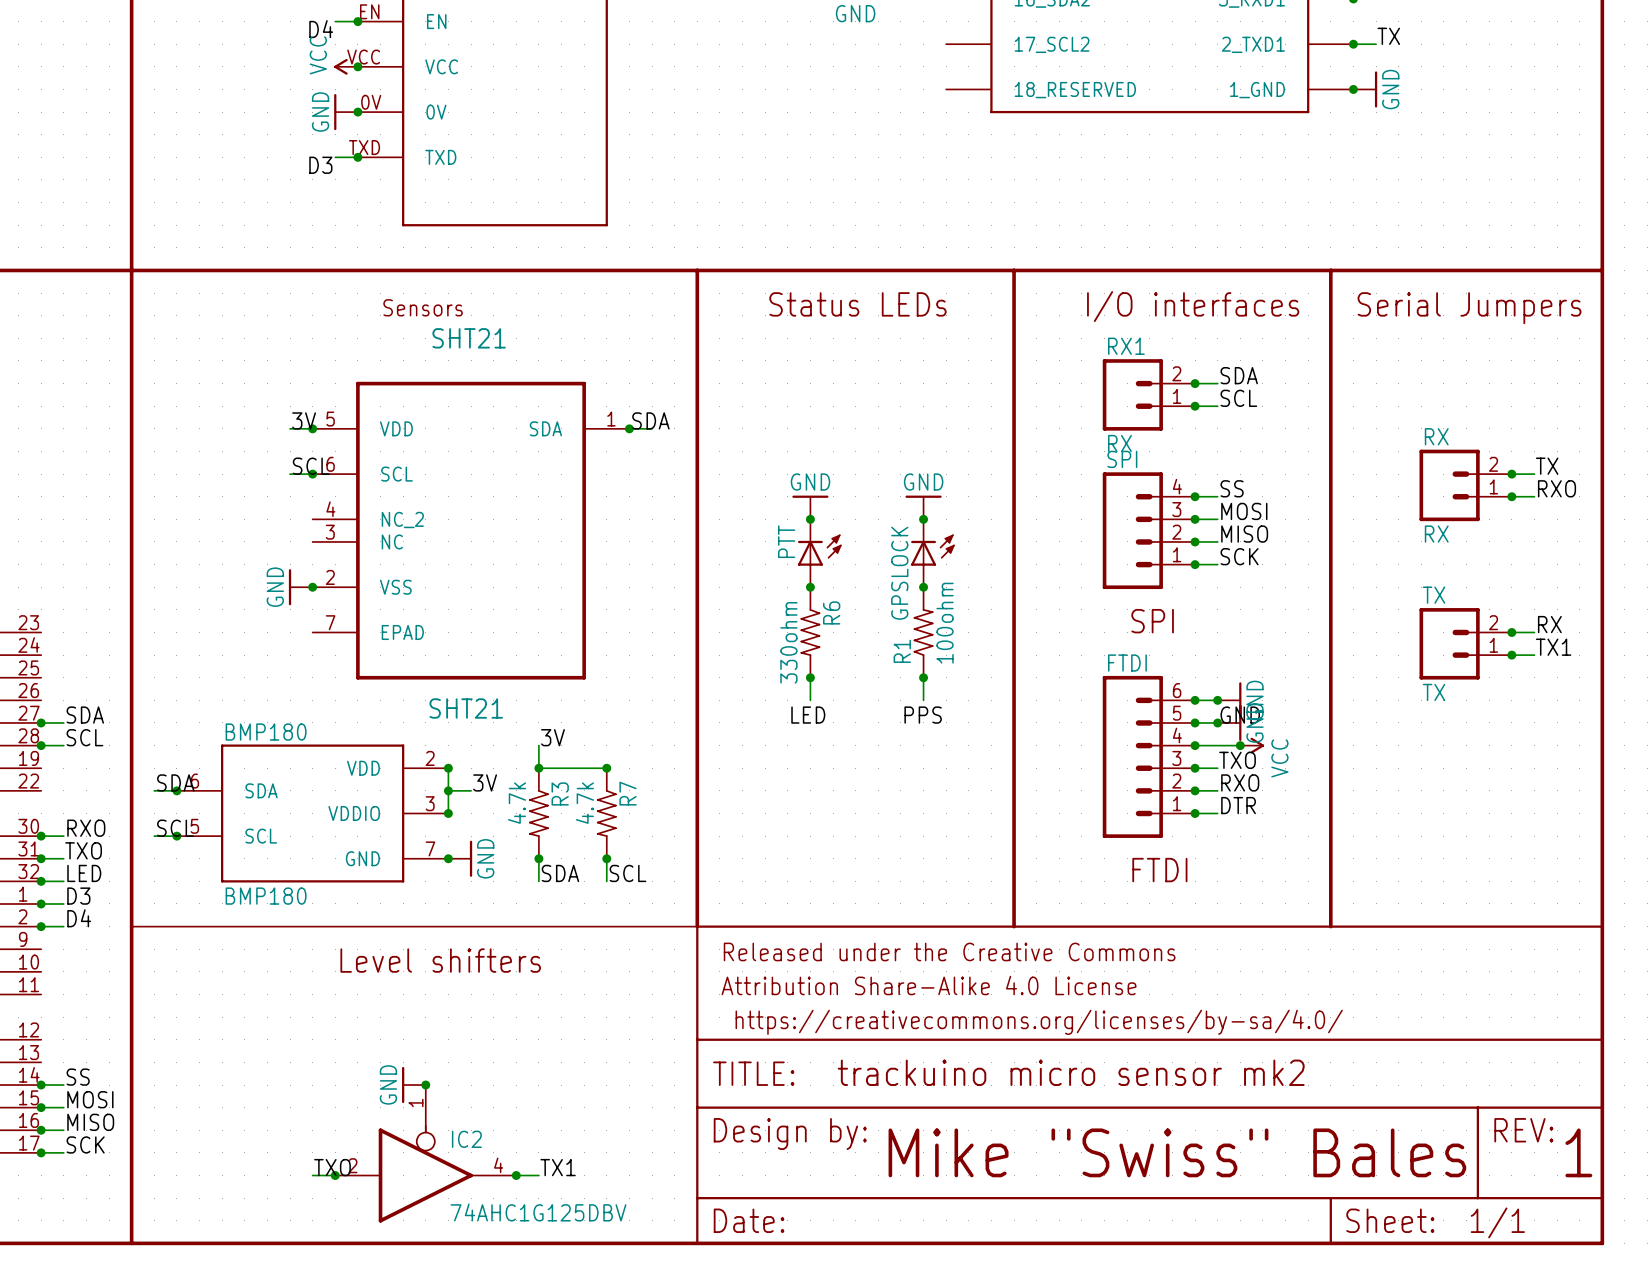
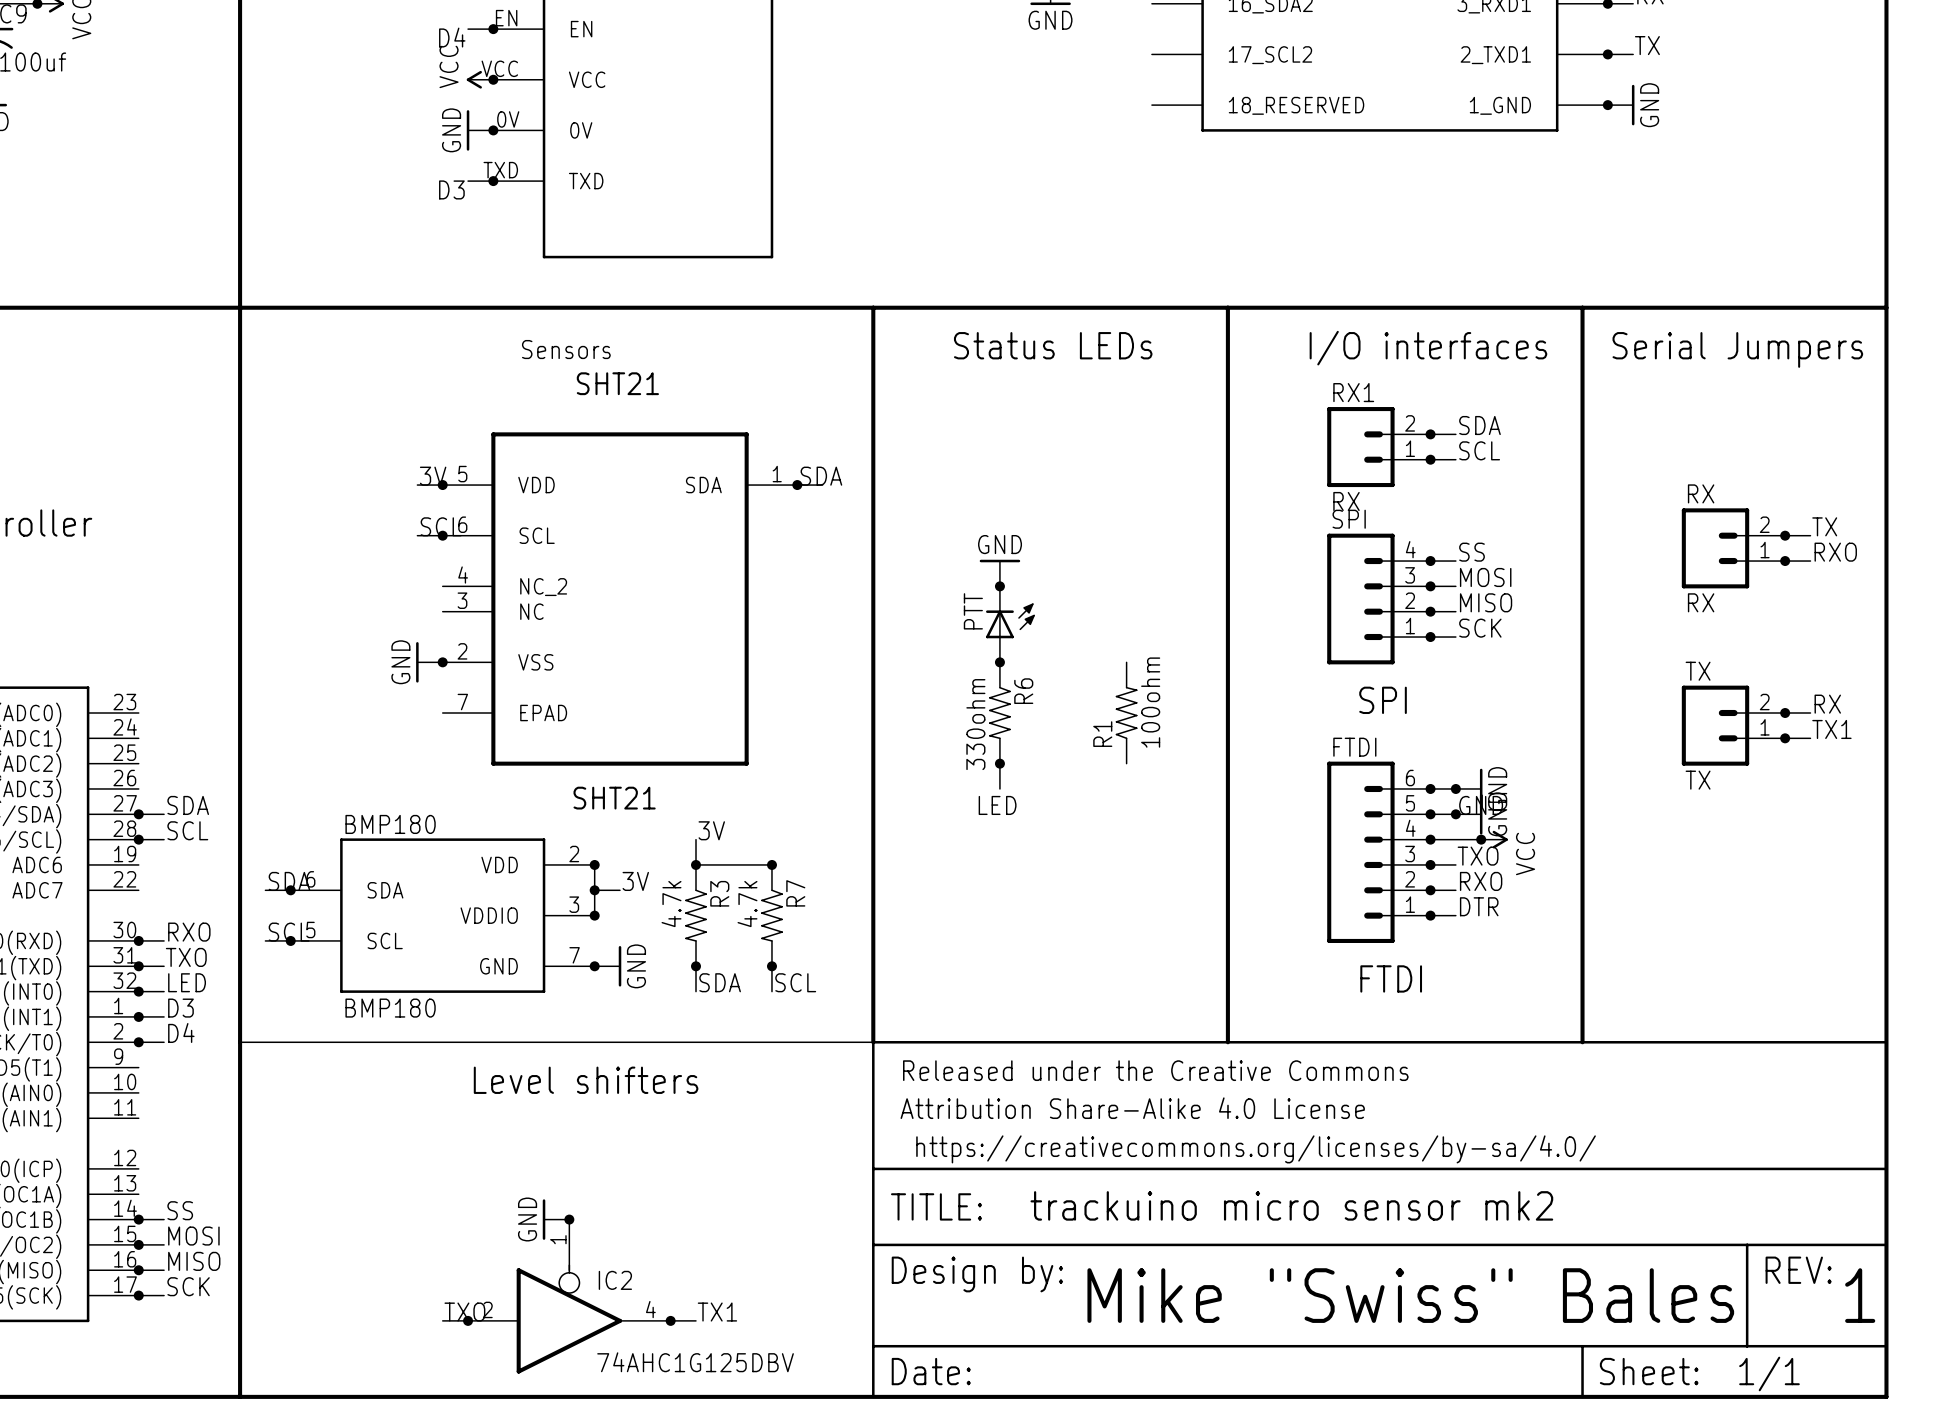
power symbol: GND (923, 507) -> none
junction: (923, 519) -> none
GPSLOCK: (932, 553) -> none
junction: (923, 587) -> none
wire: (923, 677) (923, 700) -> none
junction: (923, 677) -> none
label: PPS (923, 715) -> none

